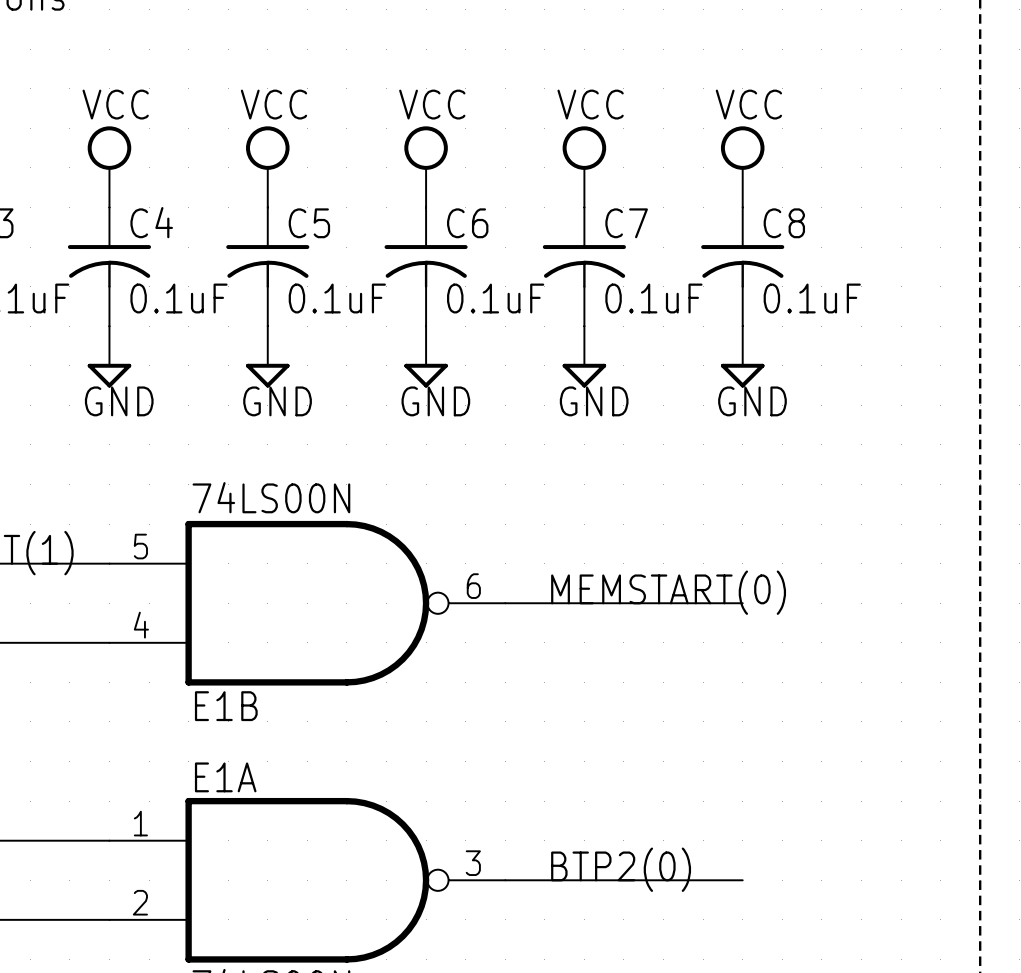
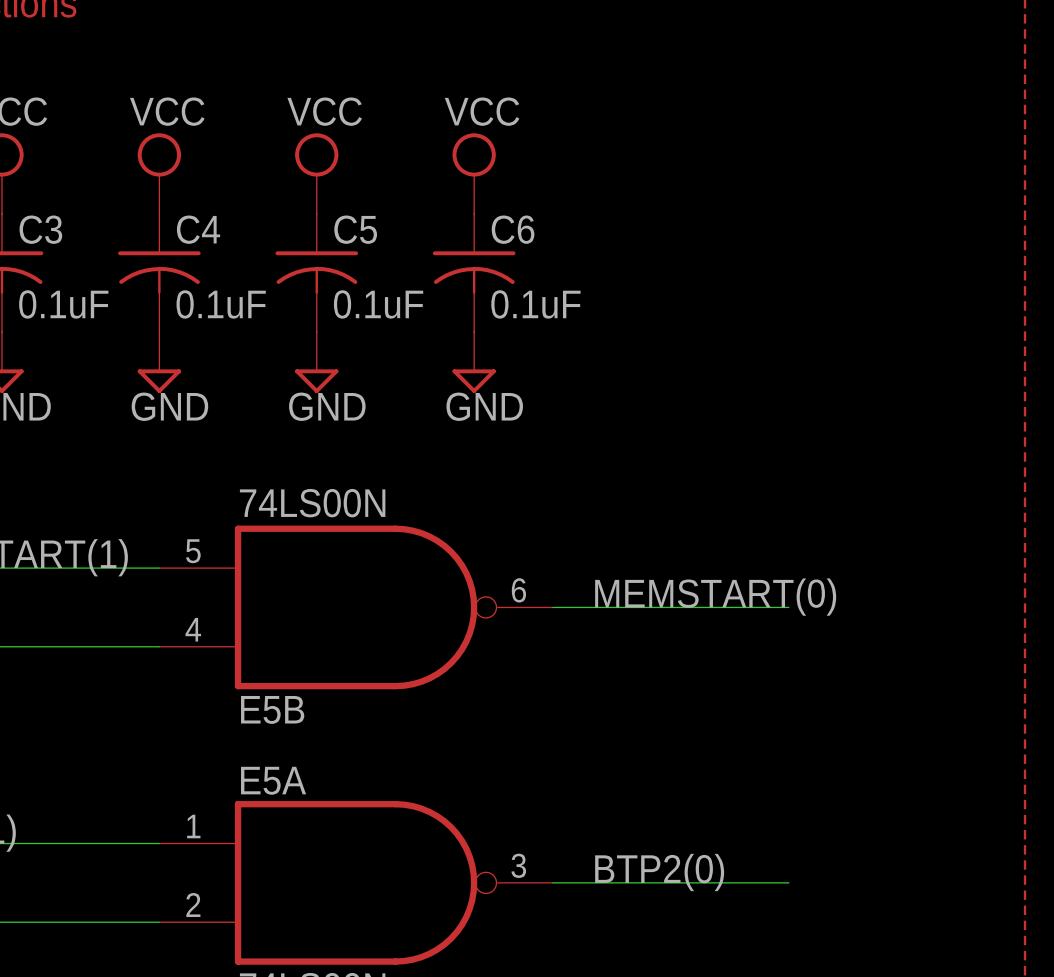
power symbol: VCC (584, 166) -> none
power symbol: VCC (742, 166) -> none
C7: 0.1uF (584, 266) -> none
C8: 0.1uF (742, 266) -> none
power symbol: GND (584, 356) -> none
power symbol: GND (742, 356) -> none
E1B name: E1B (226, 706) -> E5B (272, 709)
E1A name: E1A (225, 777) -> E5A (273, 780)

